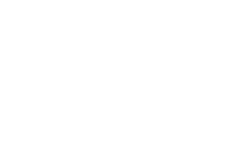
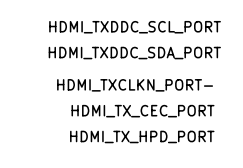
label: none -> HDMI_TXDDC_SCL_PORT (135, 27)
label: none -> HDMI_TXDDC_SDA_PORT (134, 53)
label: none -> HDMI_TXCLKN_PORT- (135, 85)
label: none -> HDMI_TX_CEC_PORT (143, 111)
label: none -> HDMI_TX_HPD_PORT (142, 136)

